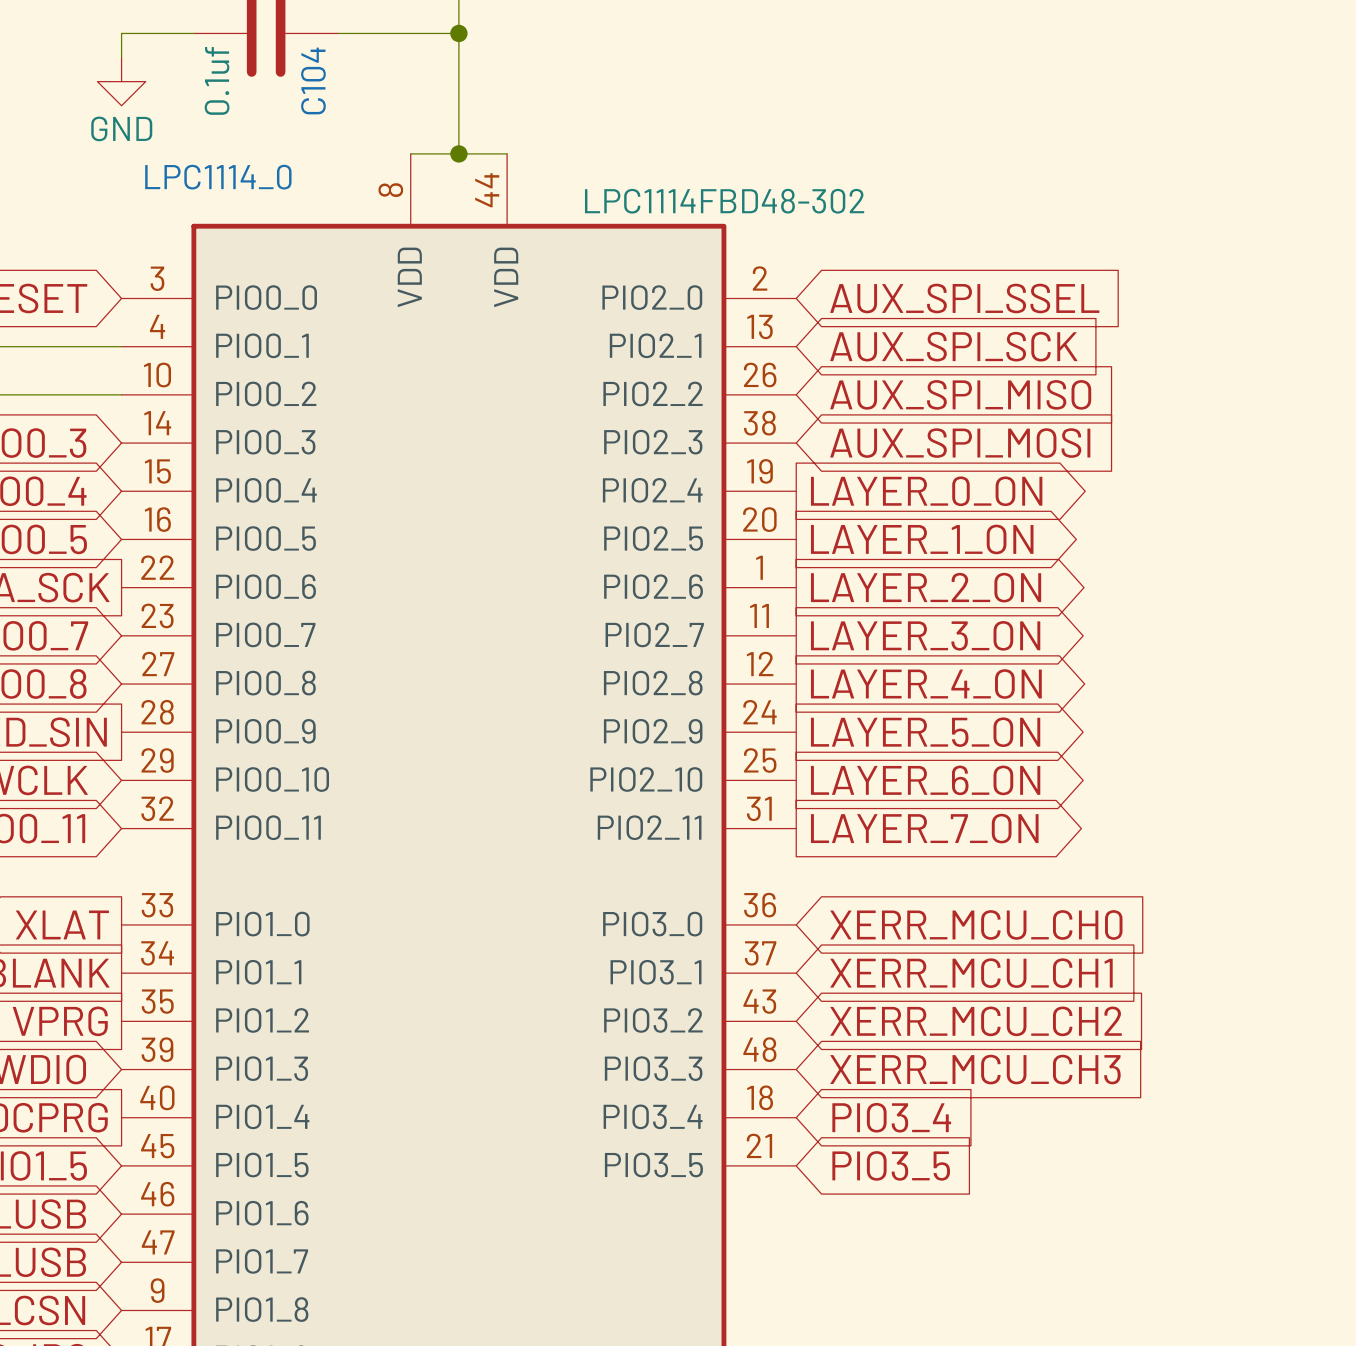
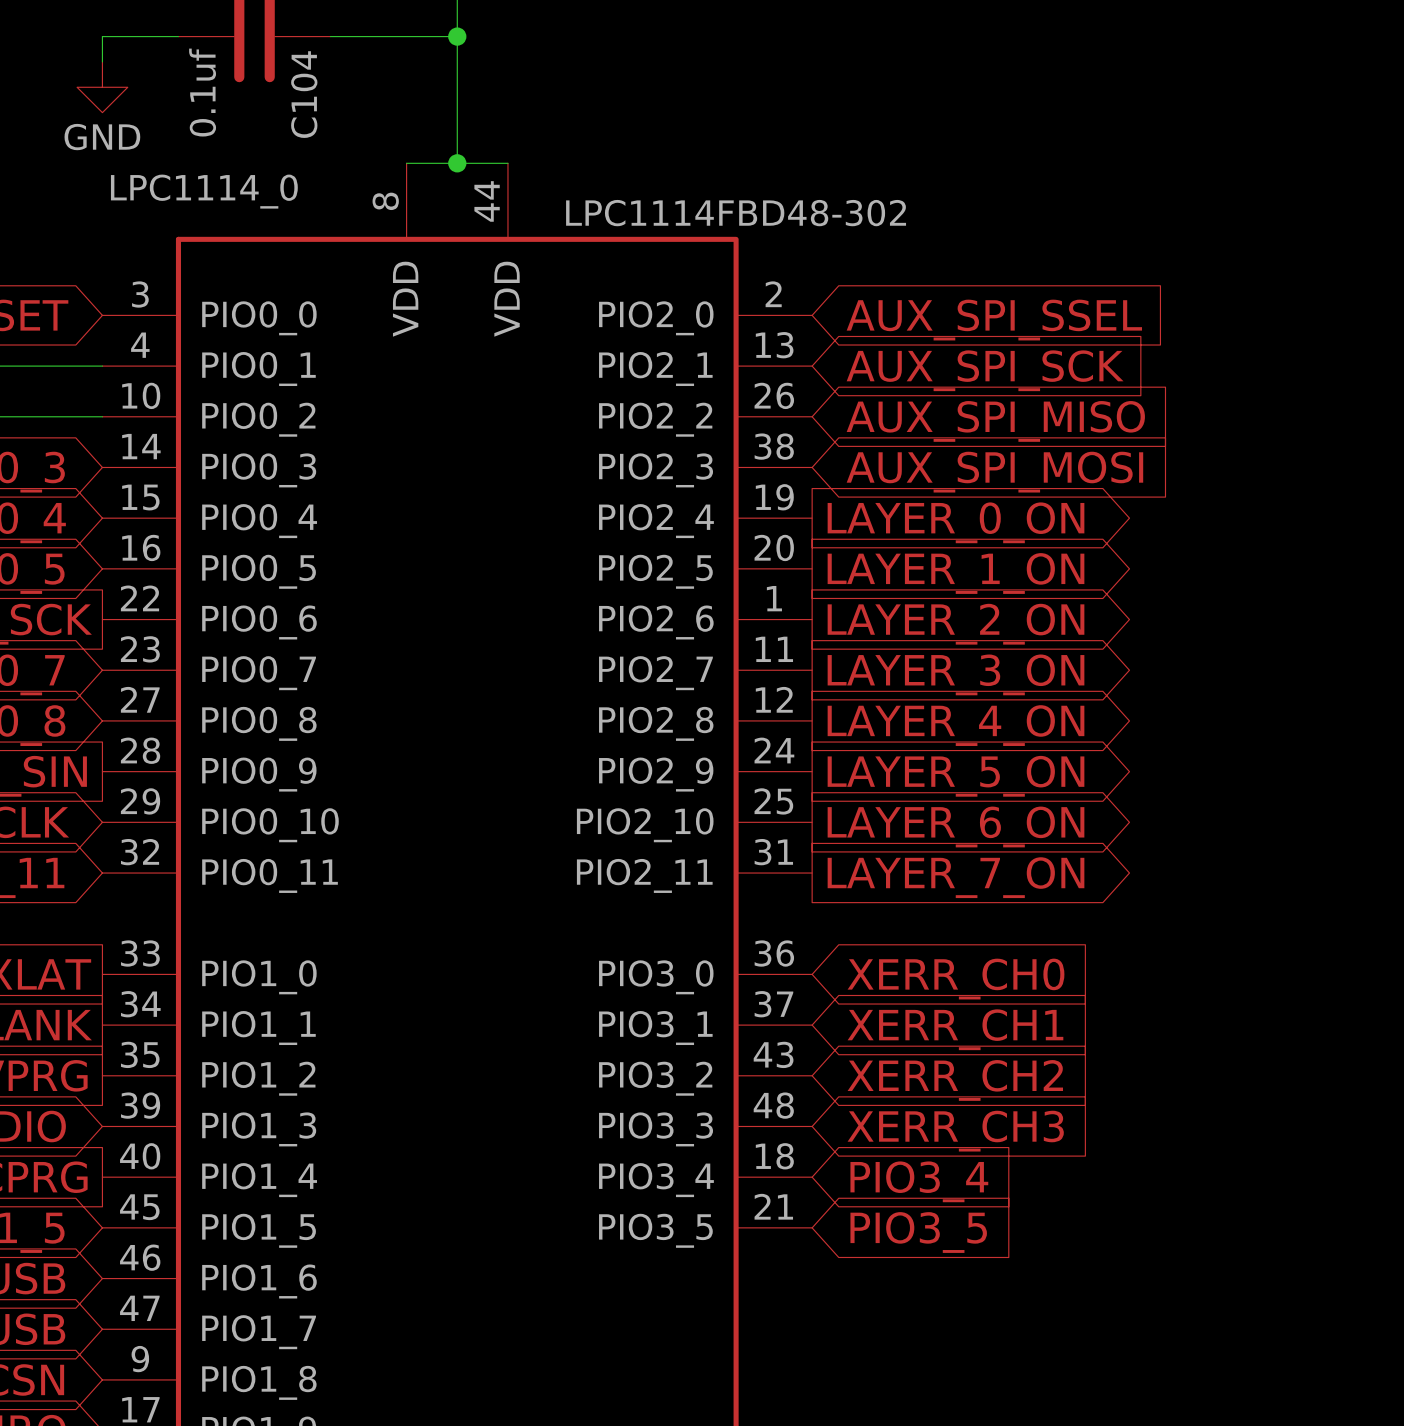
global label: XERR_MCU_CH0 (976, 924) -> XERR_CH0 (956, 979)
global label: XERR_MCU_CH1 (971, 973) -> XERR_CH1 (955, 1029)
global label: XERR_MCU_CH2 (976, 1021) -> XERR_CH2 (955, 1080)
global label: XERR_MCU_CH3 (975, 1069) -> XERR_CH3 (955, 1131)

